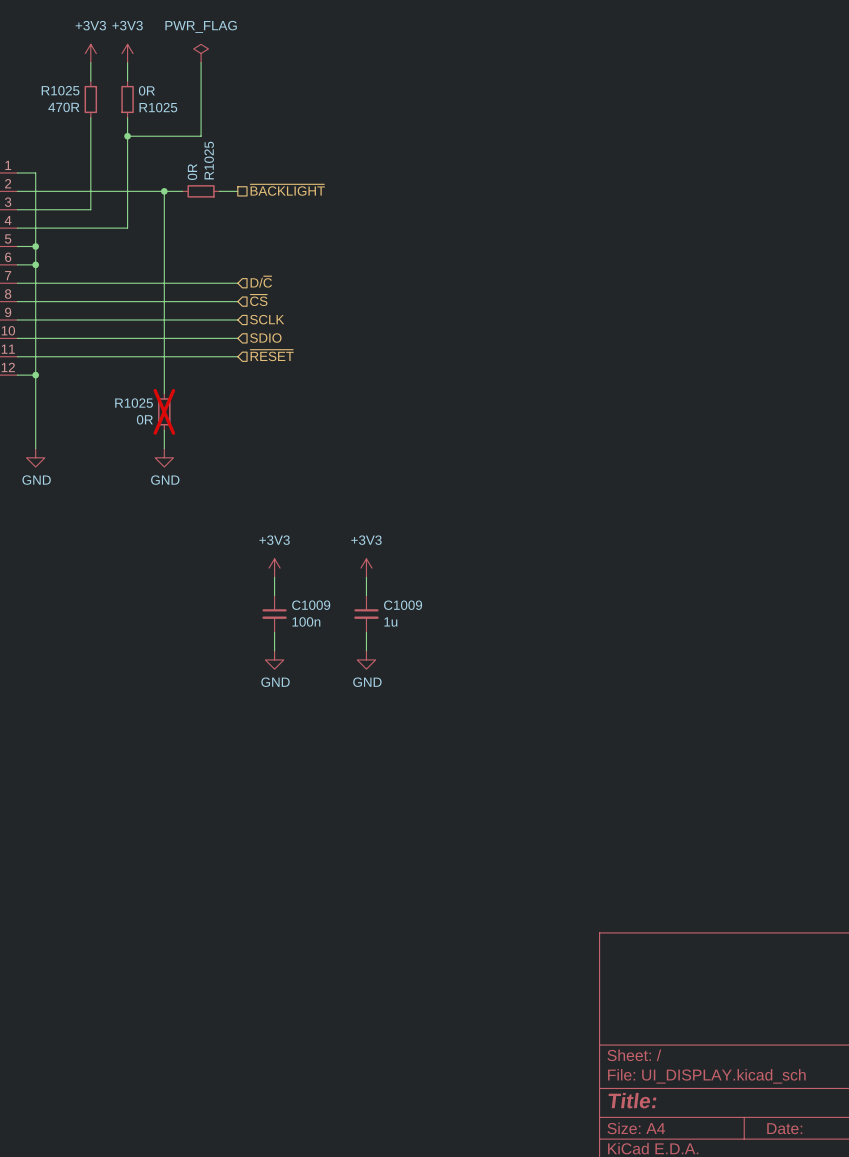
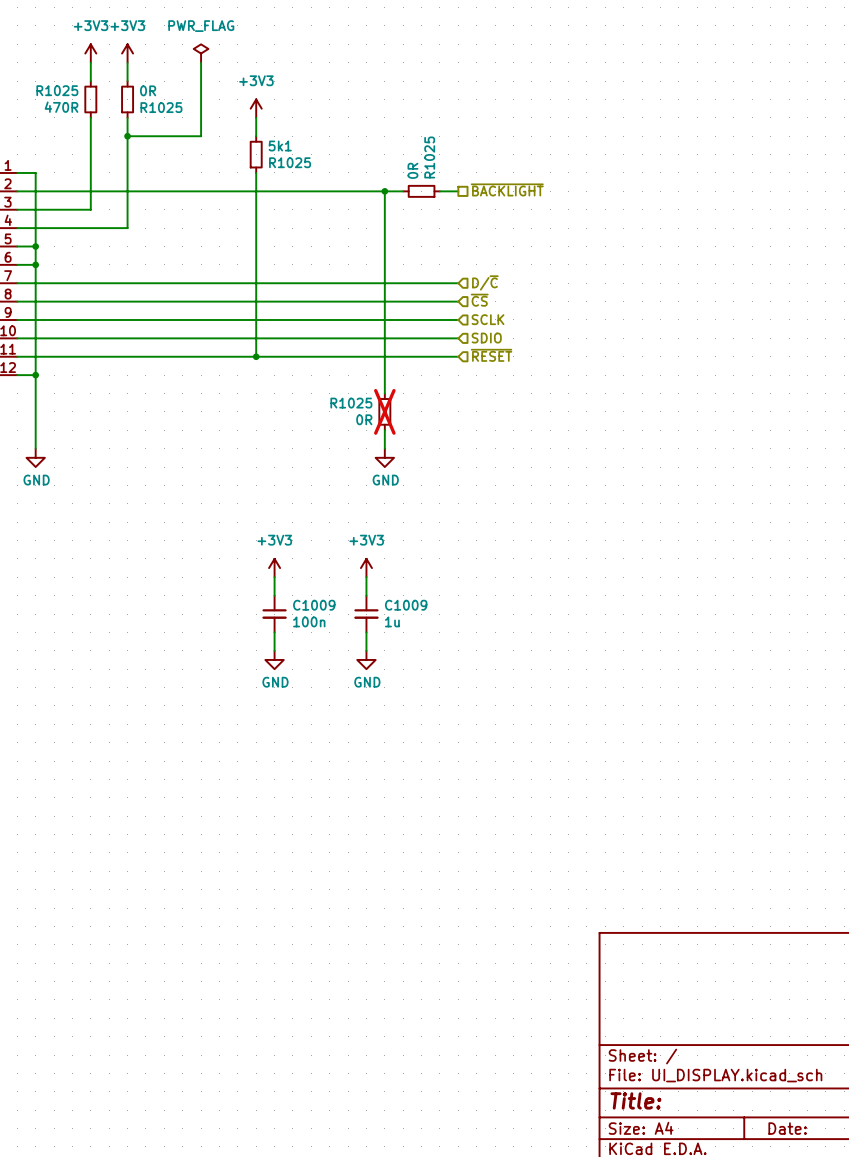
power symbol: none -> +3V3 (256, 108)
wire: none -> (256, 117) (256, 136)
R1025: none -> 5k1 (256, 154)
wire: none -> (256, 172) (256, 356)
hierarchical label: ~{BACKLIGHT} (287, 190) -> none
hierarchical label: none -> ~{BACKLIGHT} (507, 189)
wire: (164, 191) (164, 393) -> none
junction: (164, 191) -> none
wire: none -> (182, 191) (219, 191)
R1025: 0R (201, 191) -> none
wire: none -> (237, 191) (403, 191)
wire: none -> (384, 191) (384, 393)
junction: none -> (384, 191)
R1025: none -> 0R (421, 191)
wire: none -> (439, 191) (458, 191)
hierarchical label: D/~{C} (261, 281) -> none
hierarchical label: none -> D/~{C} (485, 282)
wire: none -> (237, 283) (458, 283)
hierarchical label: ~{CS} (258, 300) -> none
hierarchical label: none -> ~{CS} (479, 300)
wire: none -> (237, 301) (458, 301)
wire: none -> (237, 319) (458, 319)
hierarchical label: SCLK (267, 319) -> none
hierarchical label: none -> SCLK (488, 319)
wire: none -> (237, 338) (458, 338)
hierarchical label: SDIO (265, 338) -> none
hierarchical label: none -> SDIO (486, 338)
hierarchical label: ~{RESET} (272, 355) -> none
hierarchical label: none -> ~{RESET} (491, 355)
wire: none -> (237, 356) (458, 356)
junction: none -> (256, 356)
R1025: 0R (164, 411) -> none
R1025: none -> 0R (384, 411)
wire: (164, 430) (164, 448) -> none
wire: none -> (384, 430) (384, 448)
power symbol: GND (164, 457) -> none
power symbol: none -> GND (384, 457)

